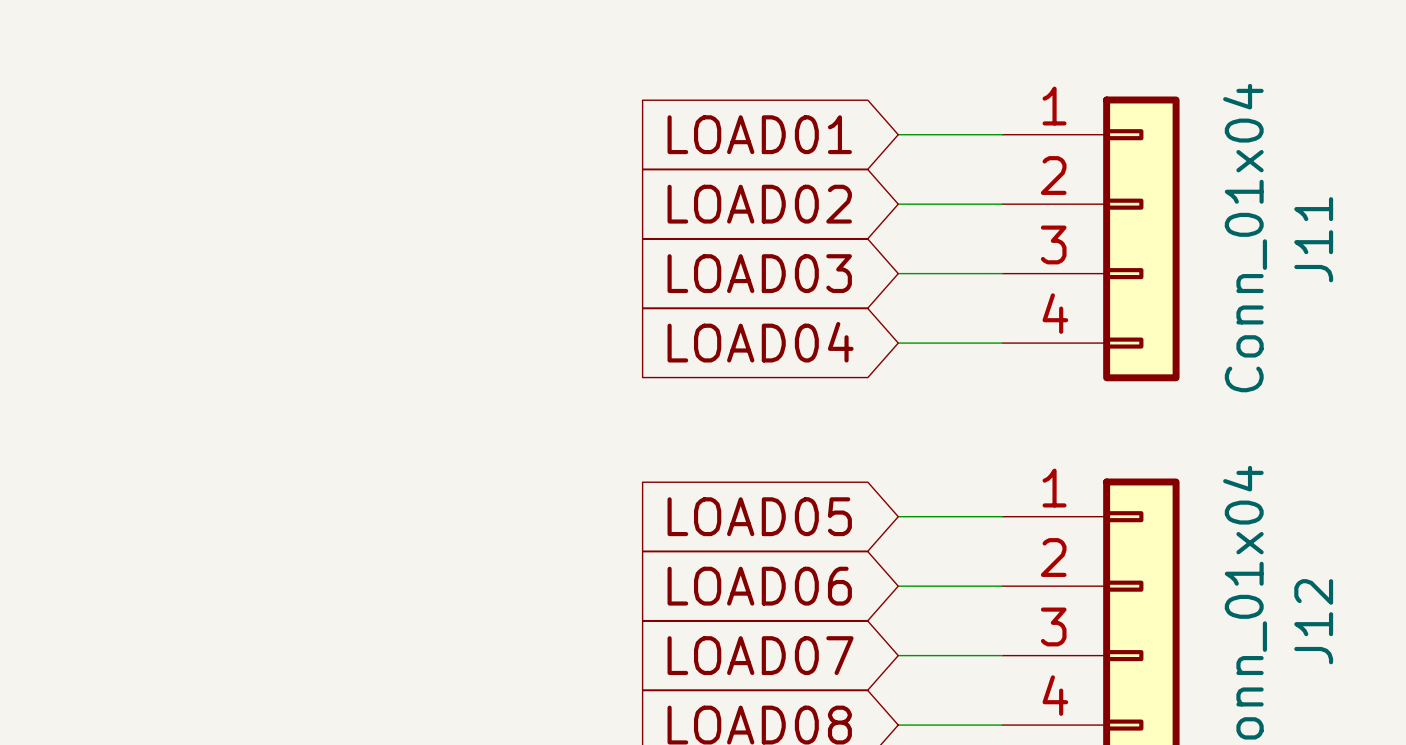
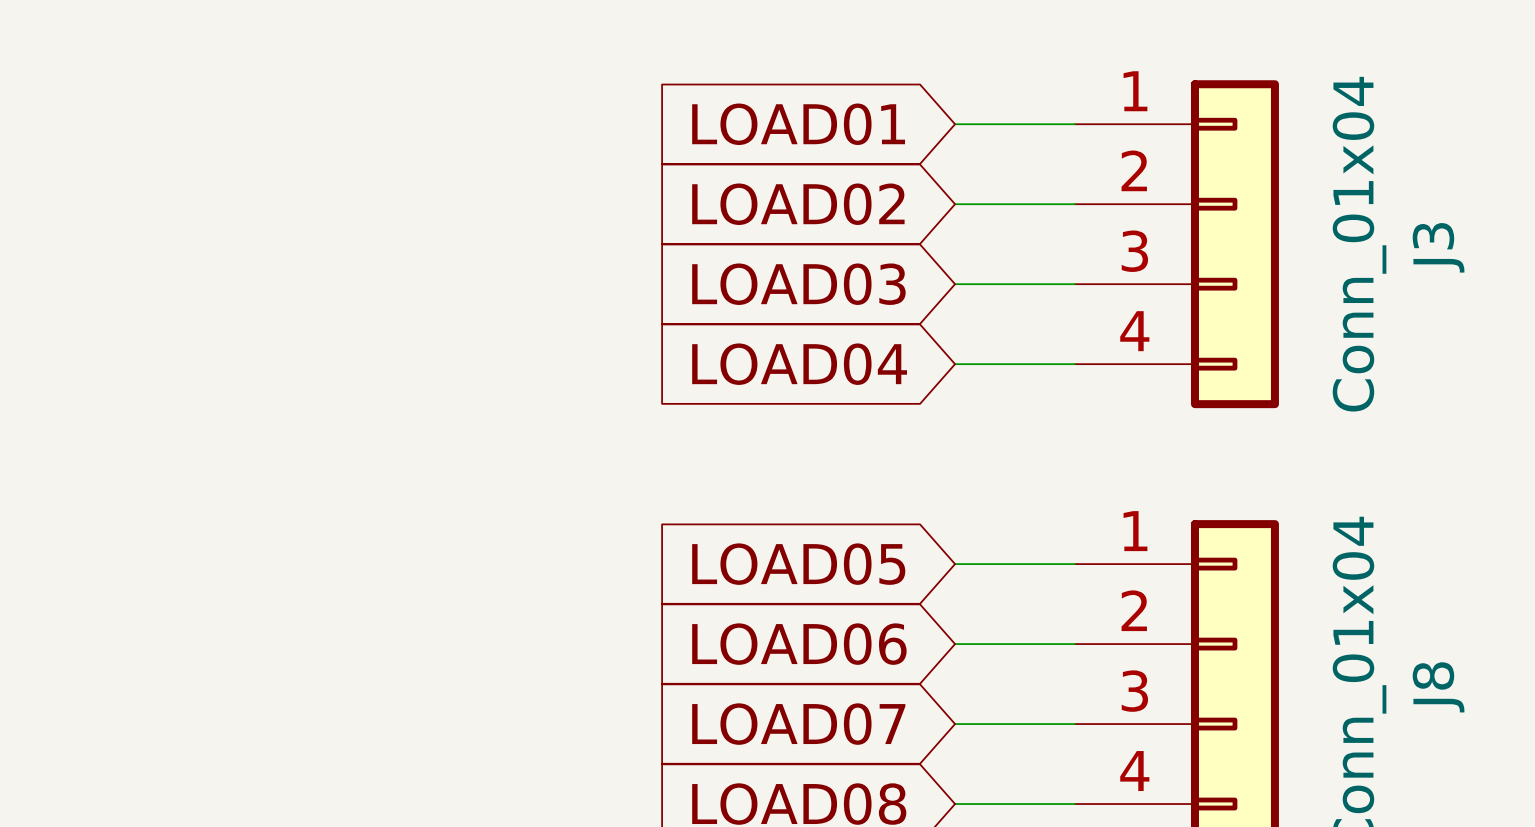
J11 name: J11 (1313, 239) -> J3 (1438, 247)
J12 name: J12 (1313, 621) -> J8 (1438, 687)

